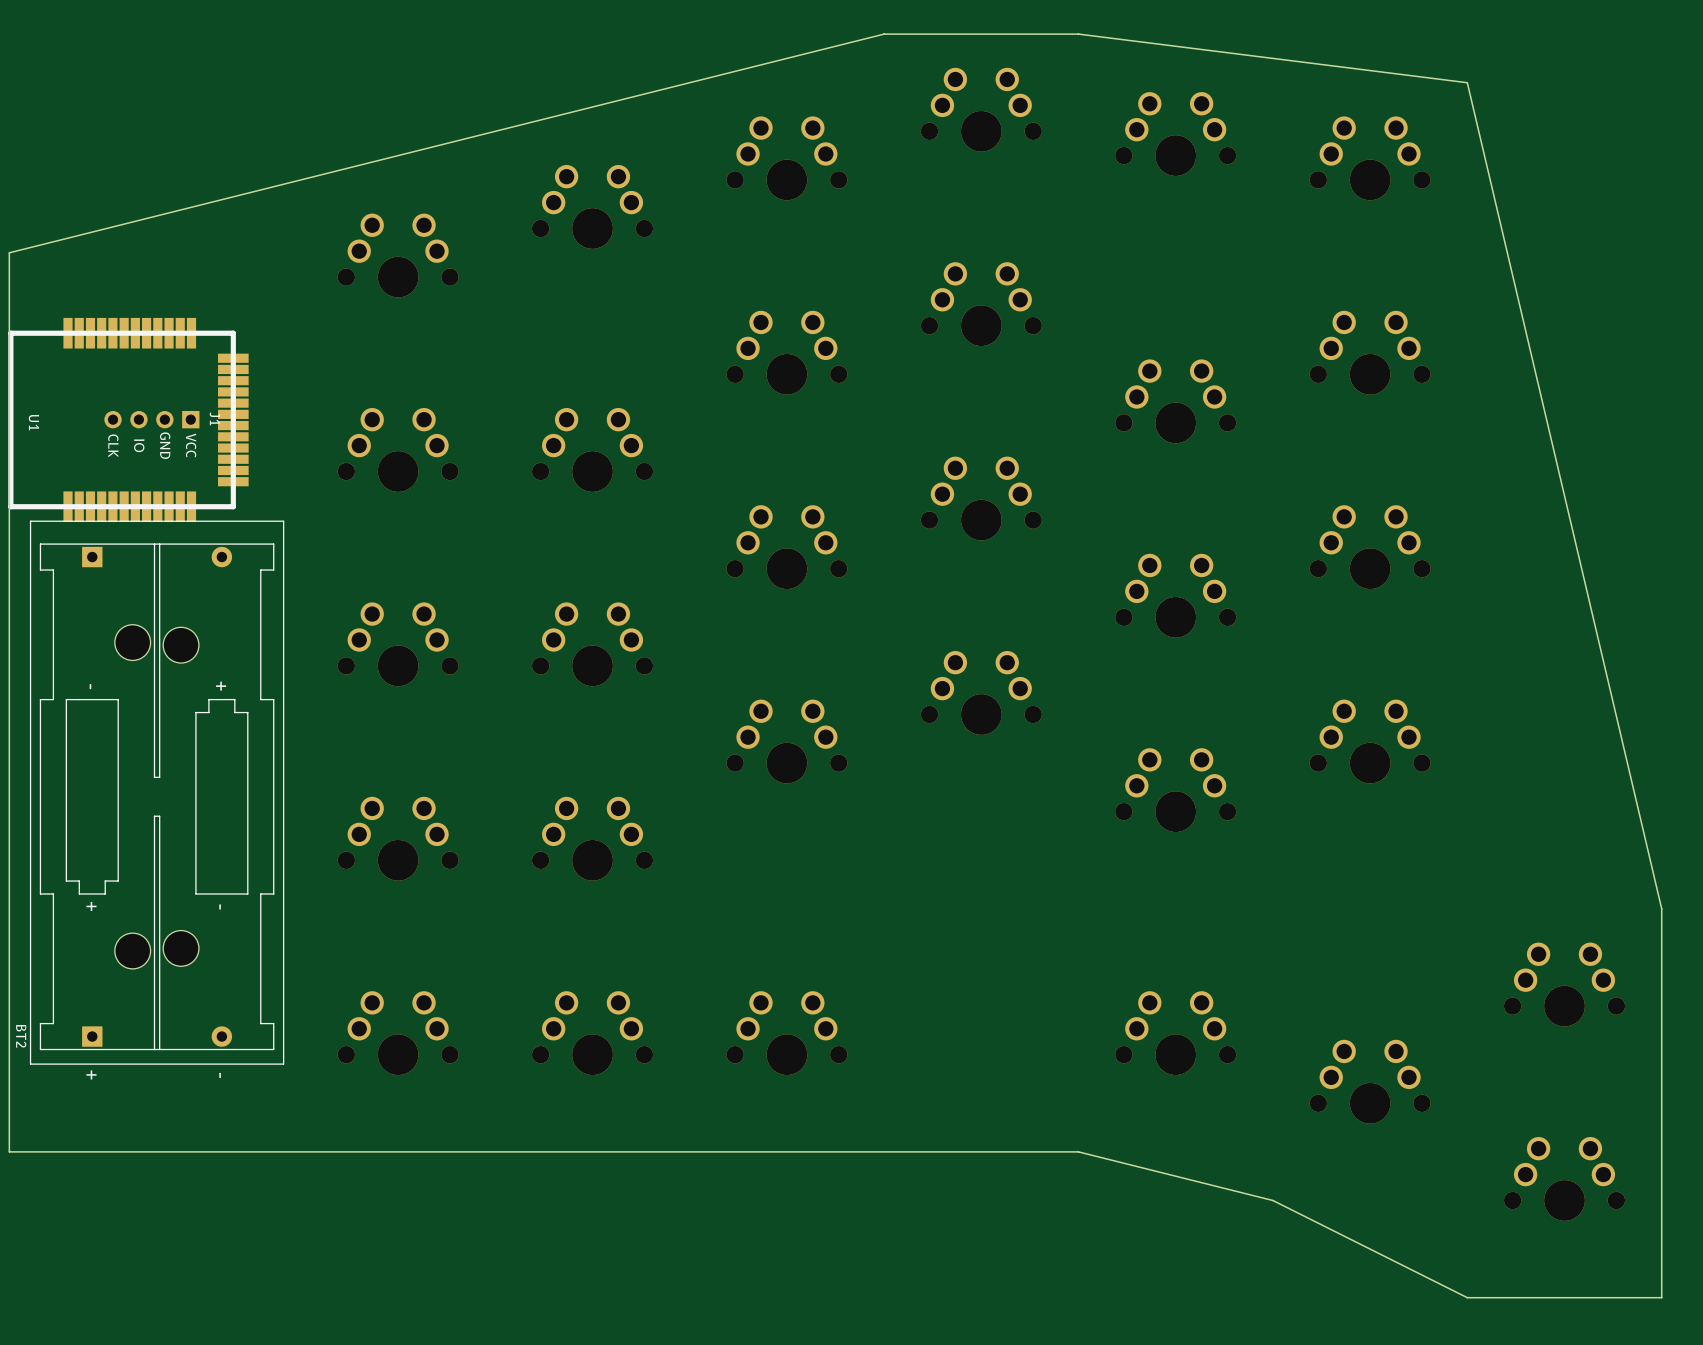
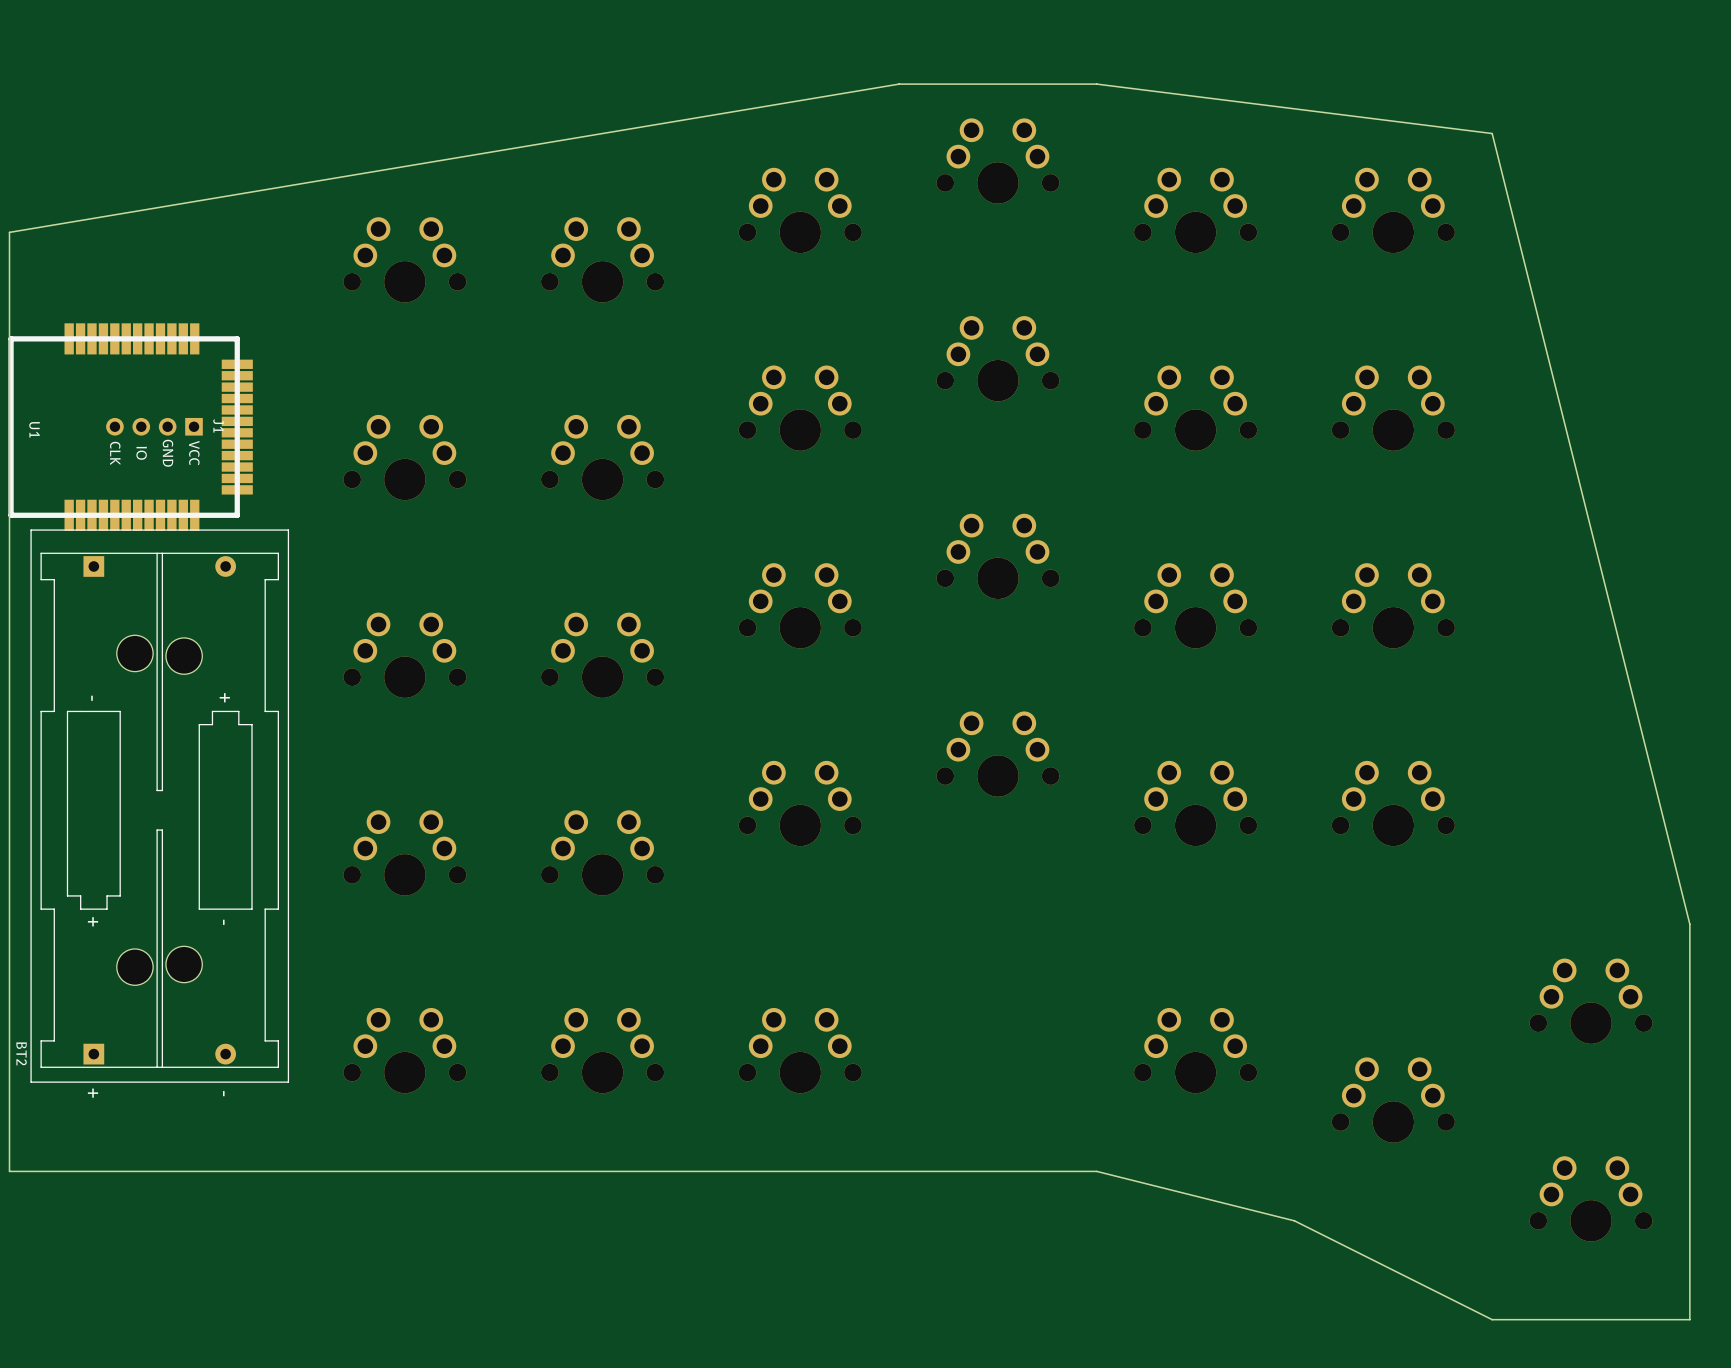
part position: (981, 109) -> (997, 161)
part position: (1175, 134) -> (1195, 210)
part position: (786, 158) -> (800, 210)
part position: (1370, 158) -> (1393, 210)
part position: (592, 206) -> (602, 259)
board edge: (9, 252) (884, 34) (1078, 34) (1467, 82) (1661, 908) -> (9, 257) (9, 232) (899, 84) (1096, 84) (1492, 133) (1689, 924)
part position: (981, 304) -> (997, 358)
part position: (786, 352) -> (800, 408)
part position: (1370, 352) -> (1393, 408)
part position: (981, 498) -> (997, 556)
part position: (786, 547) -> (800, 605)
part position: (1370, 547) -> (1393, 605)
part position: (981, 692) -> (997, 754)
part position: (786, 741) -> (800, 803)
part position: (1370, 741) -> (1393, 803)

